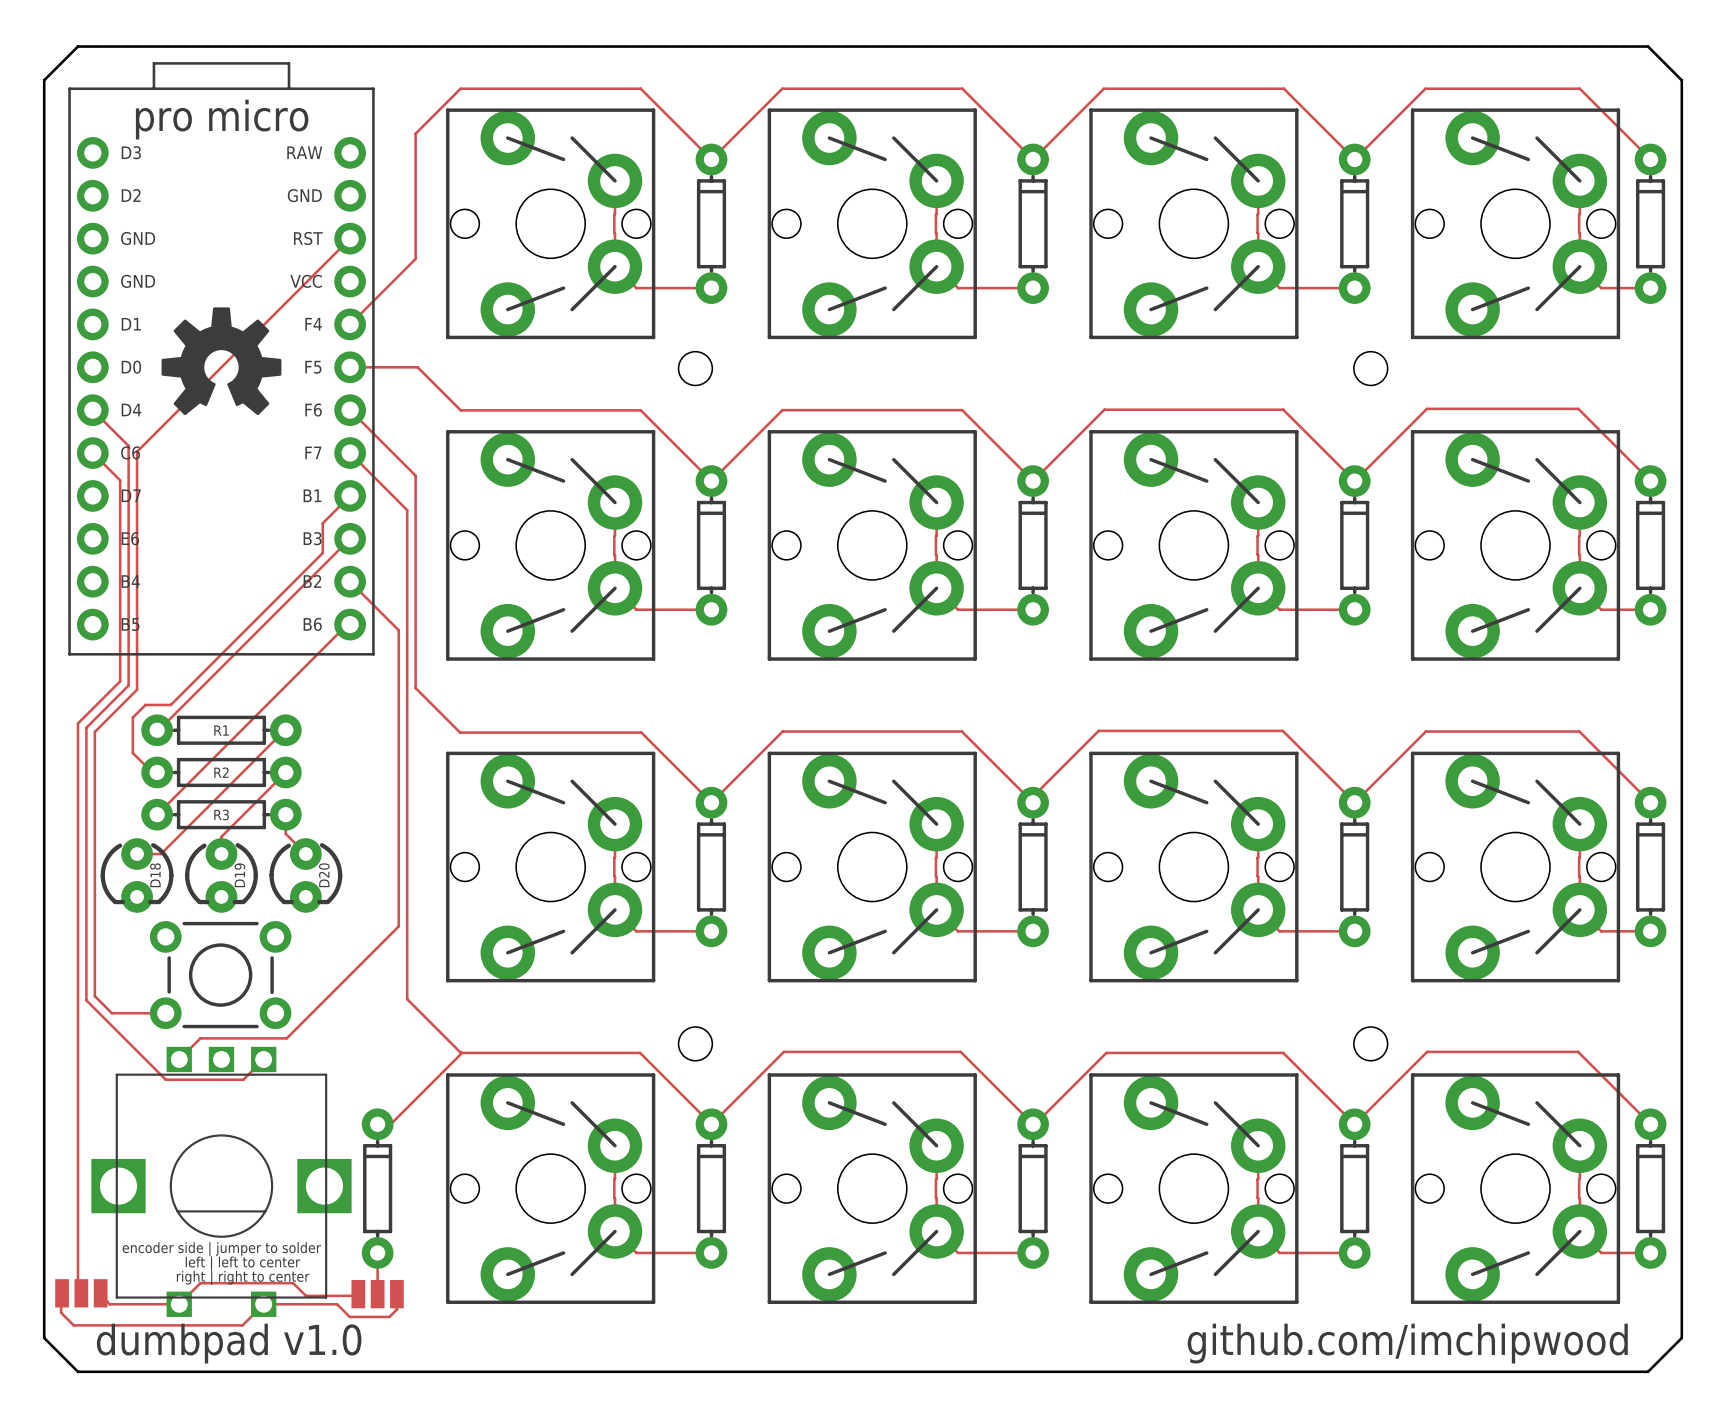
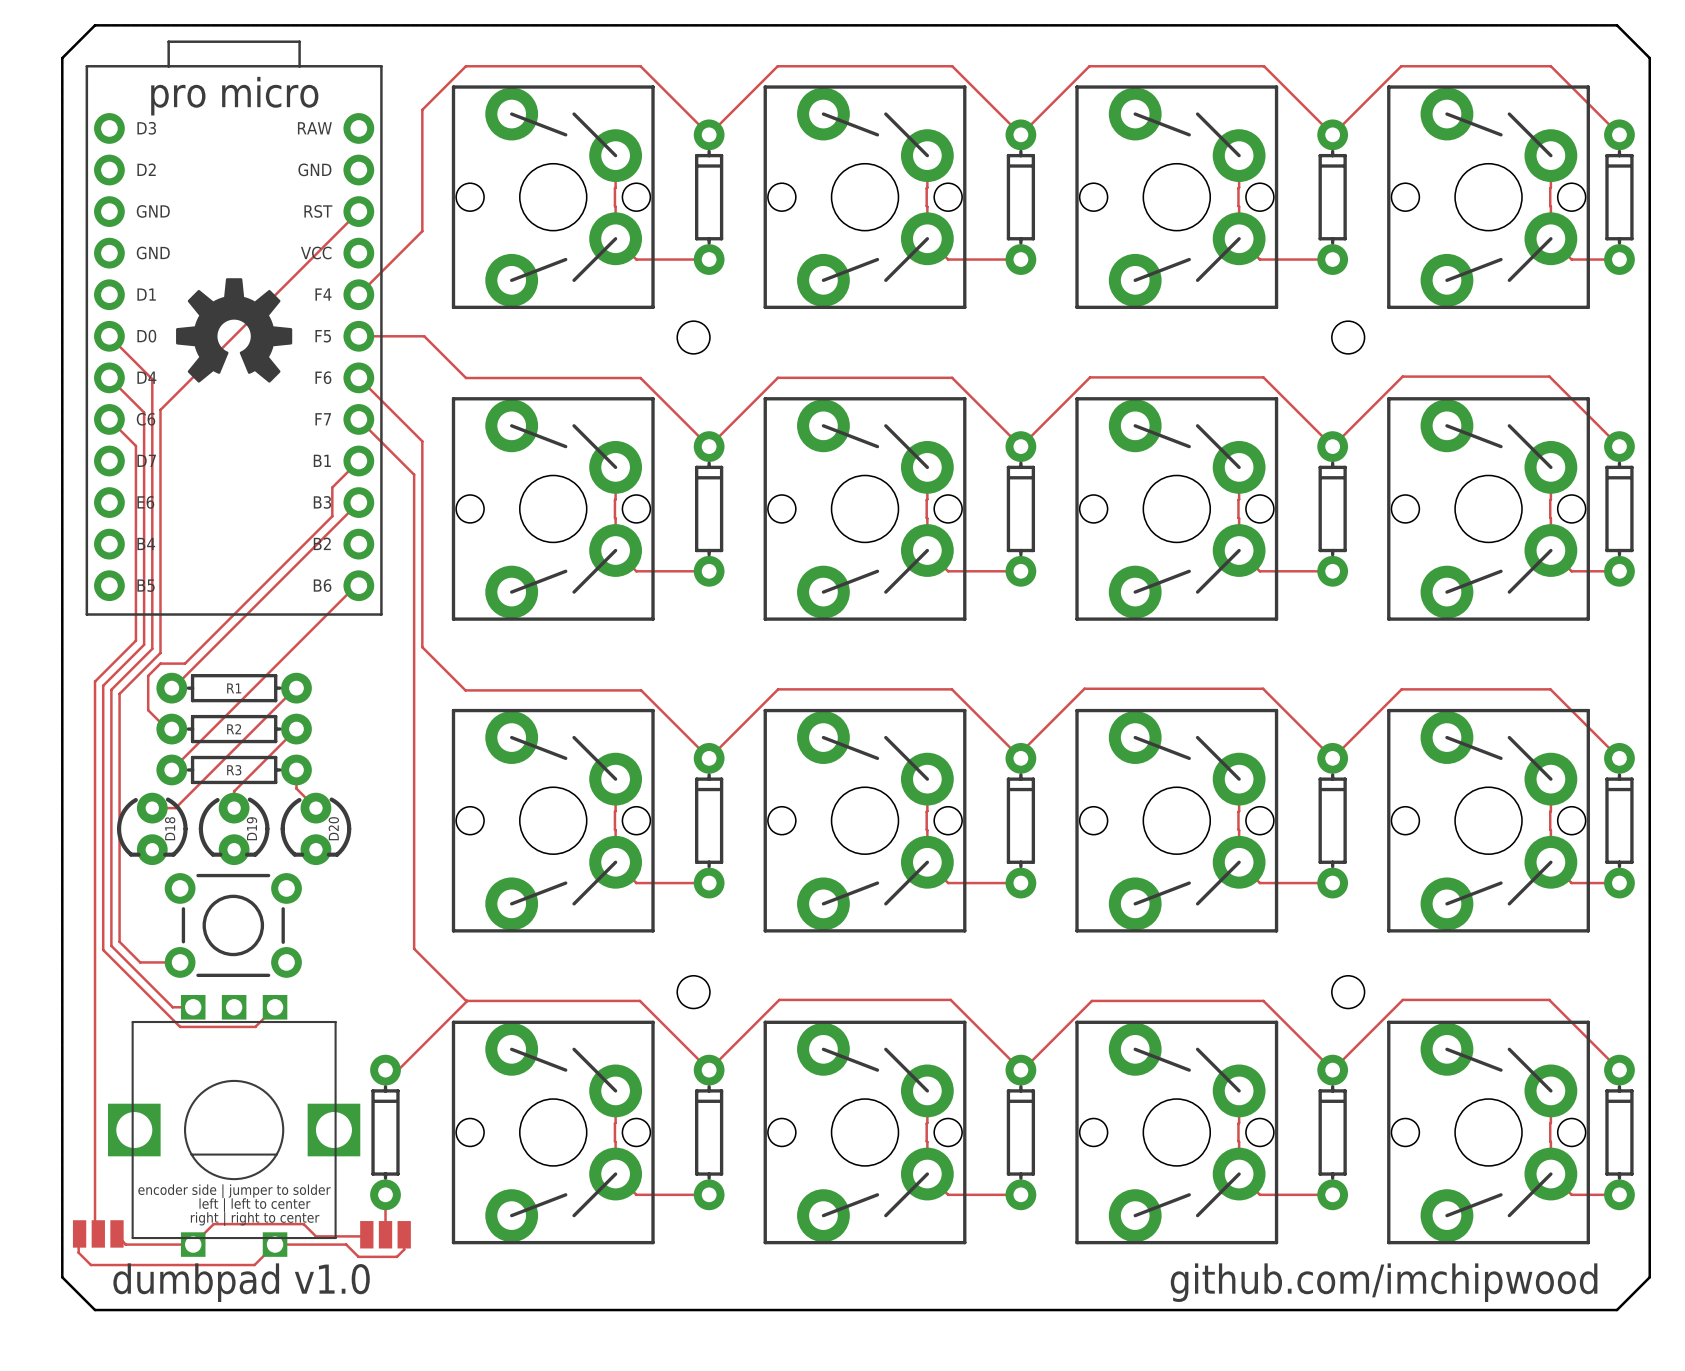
track: (145, 443) (137, 451) -> (109, 336) (152, 379) (152, 418)
track: none -> (160, 409) (160, 652) (119, 693) (119, 941) (140, 962)
track: (350, 581) (398, 630) (398, 926) (286, 1038) (200, 1038) (179, 1059) -> none
track: (111, 1013) (124, 1013) -> (127, 962) (172, 1007) (193, 1007)

